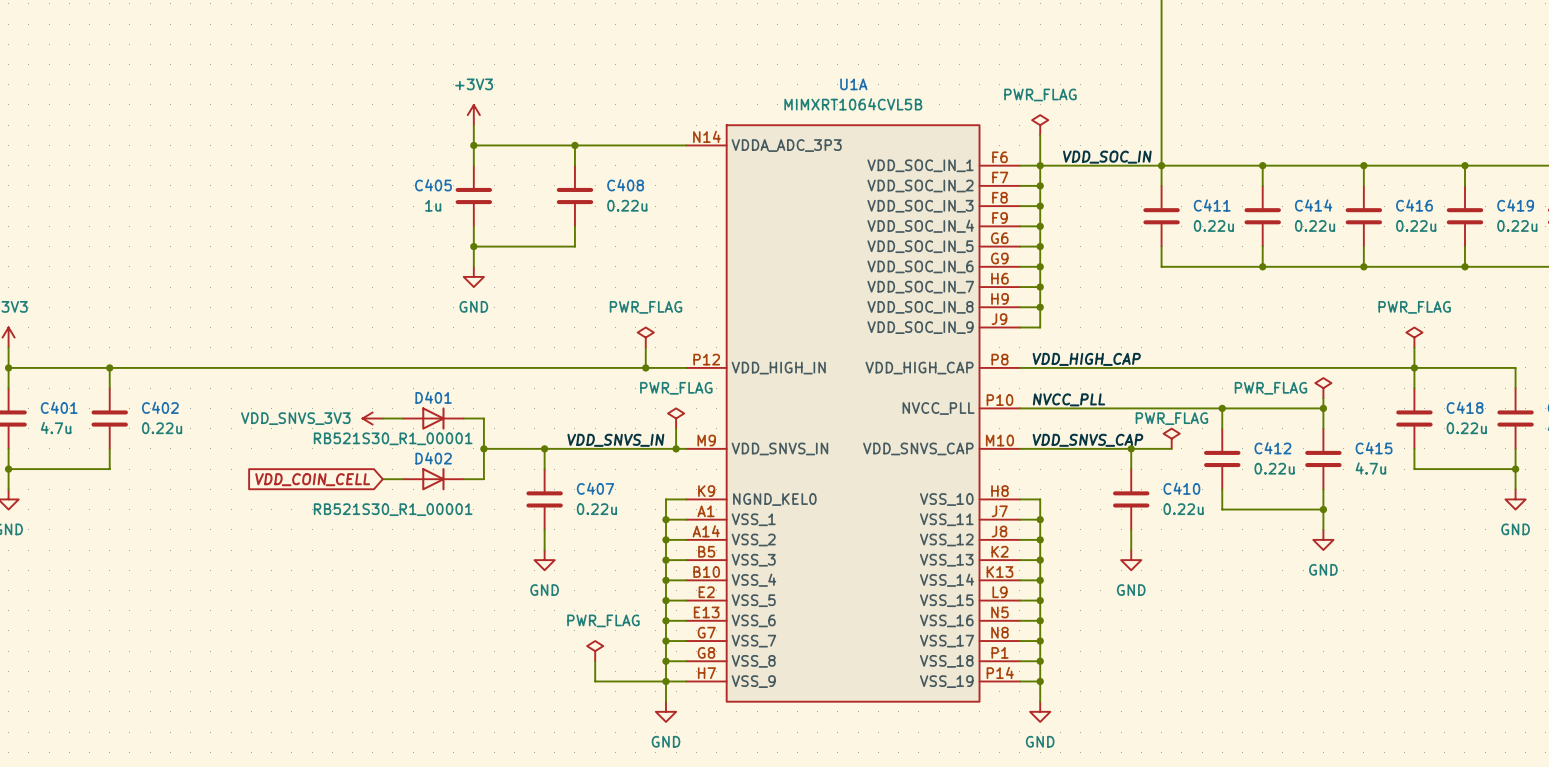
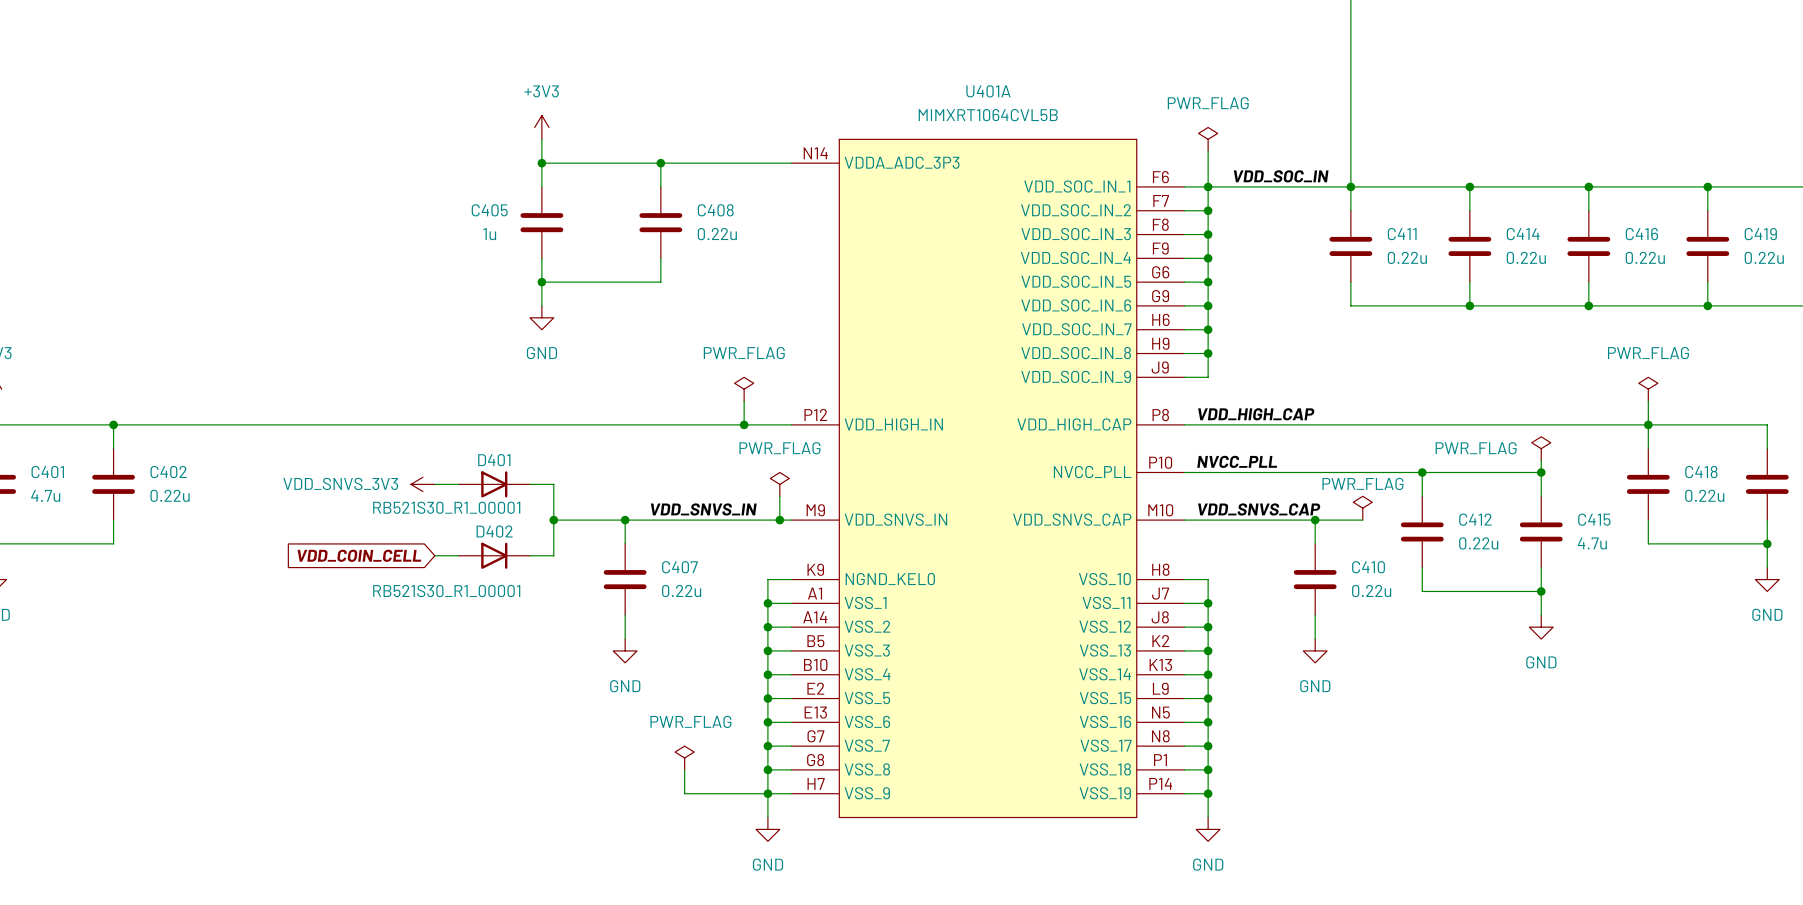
U1A name: U1A (853, 84) -> U401A (988, 91)

